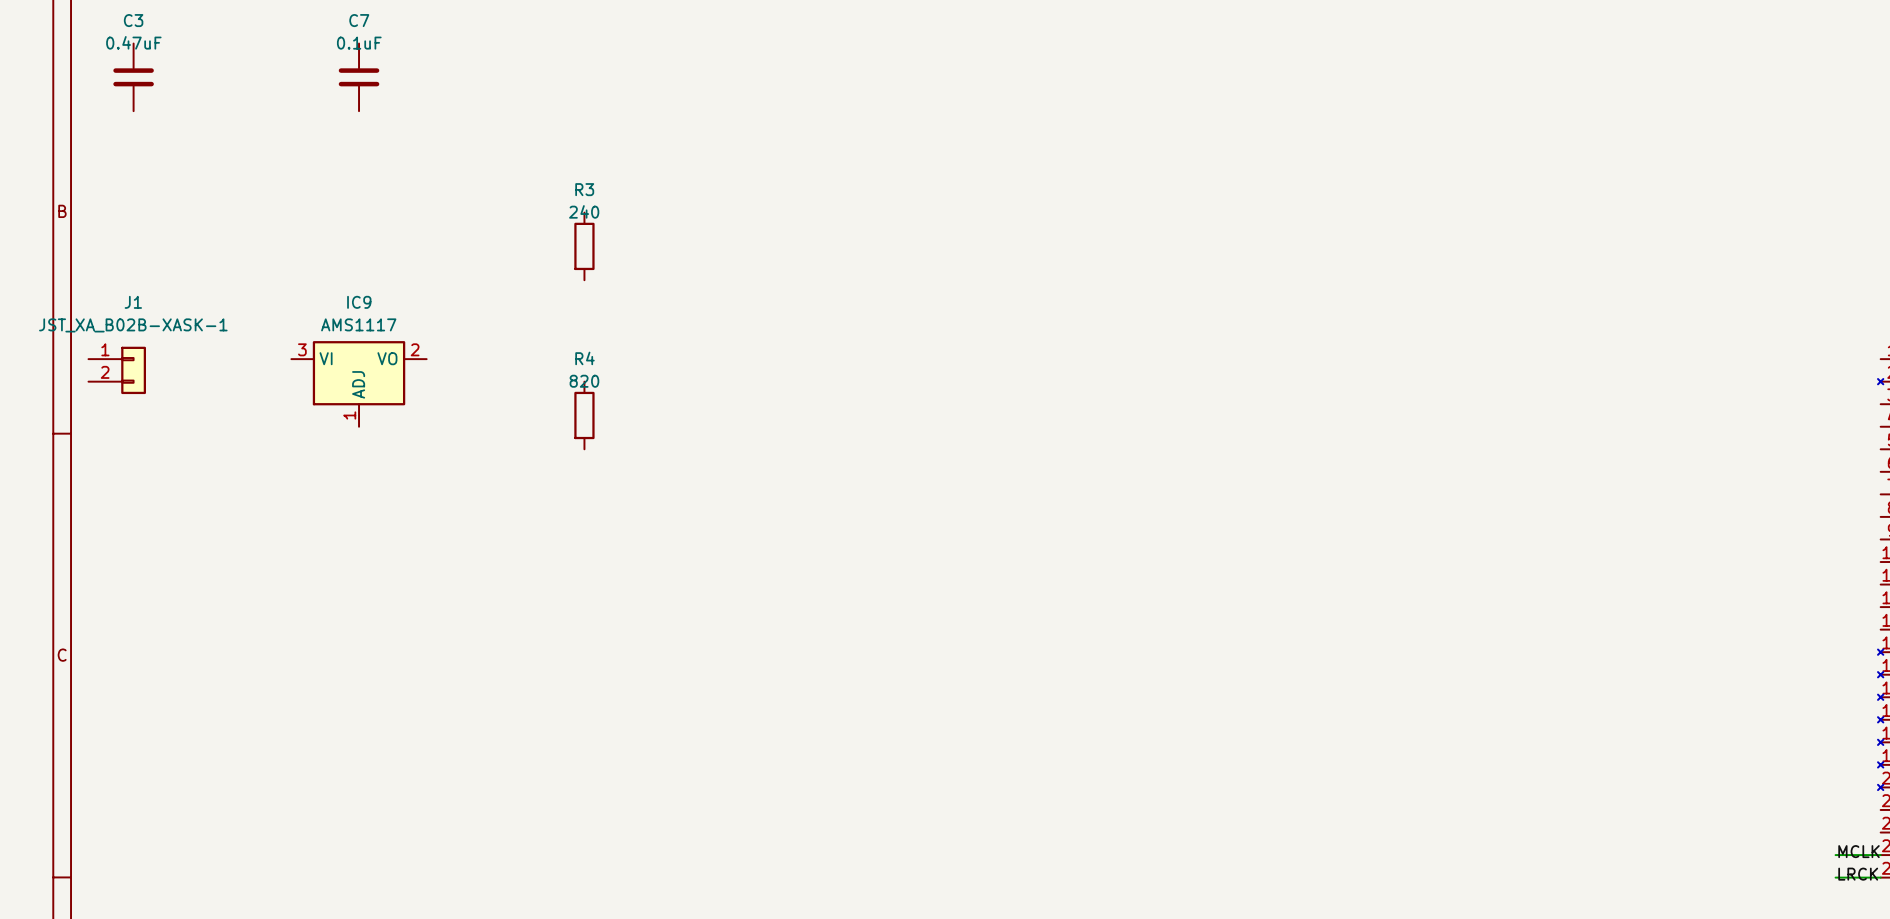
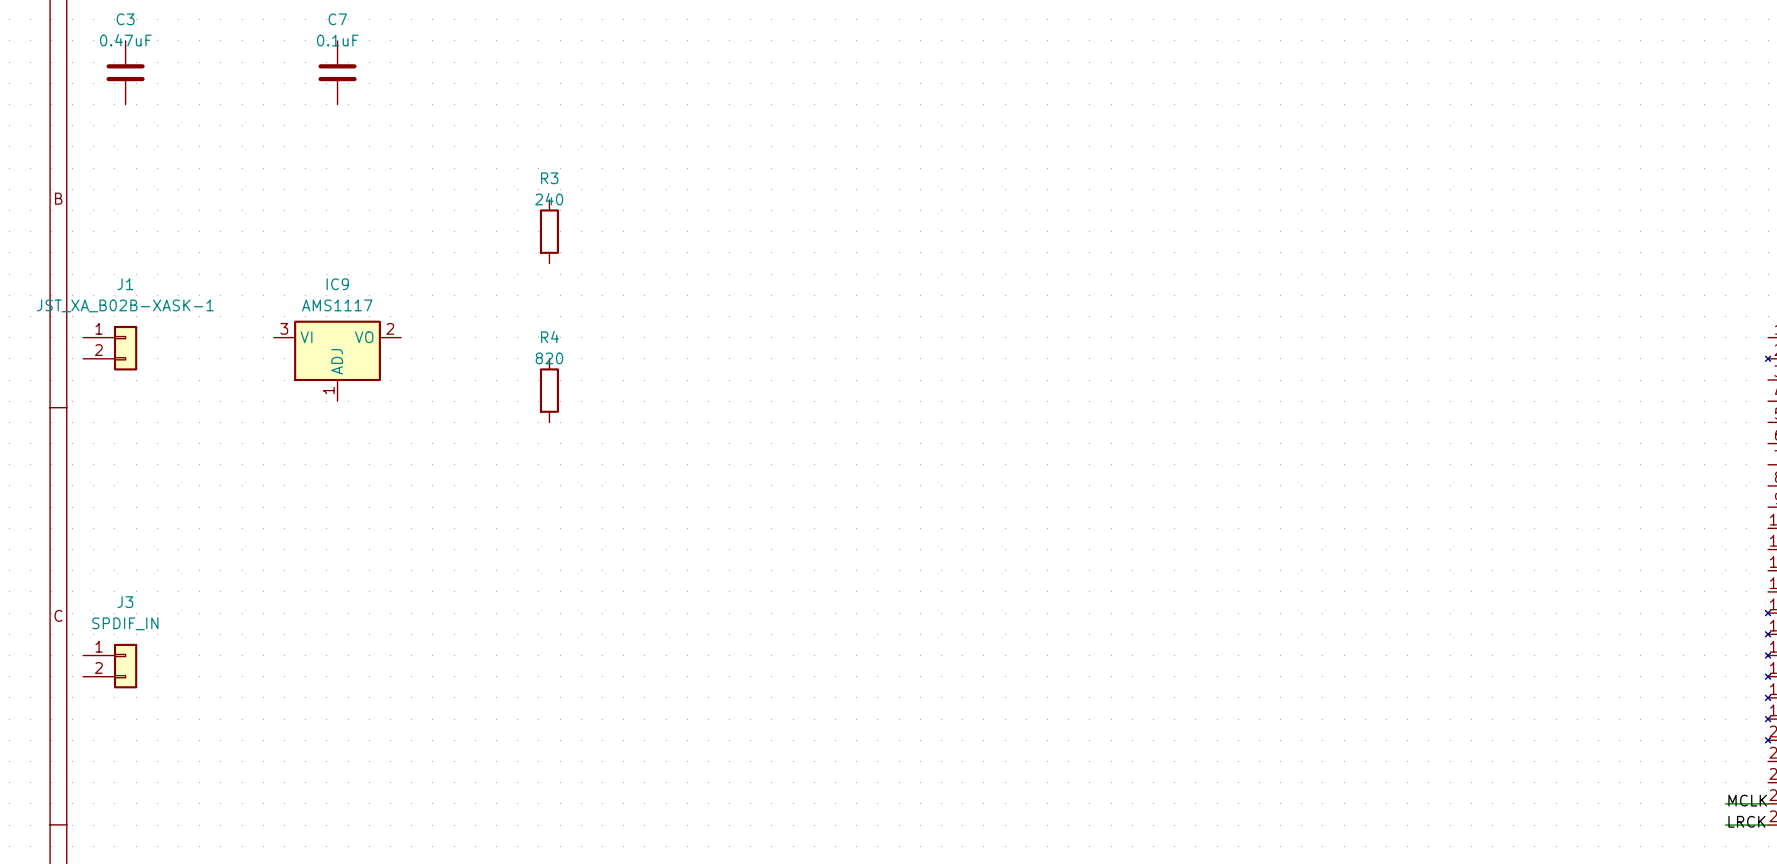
J3: none -> SPDIF_IN (110, 666)

